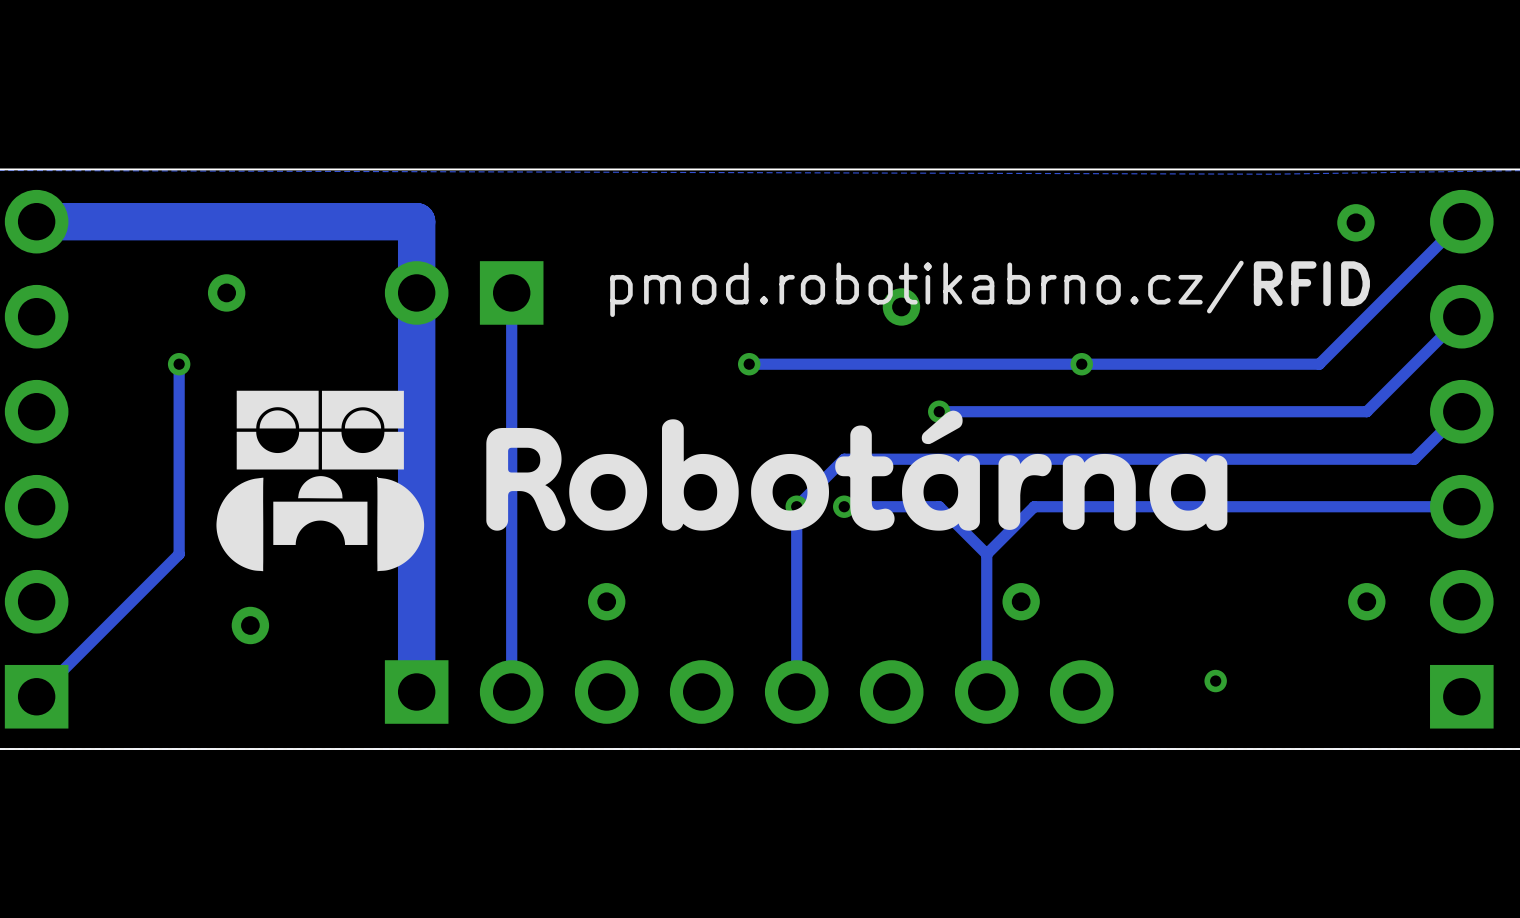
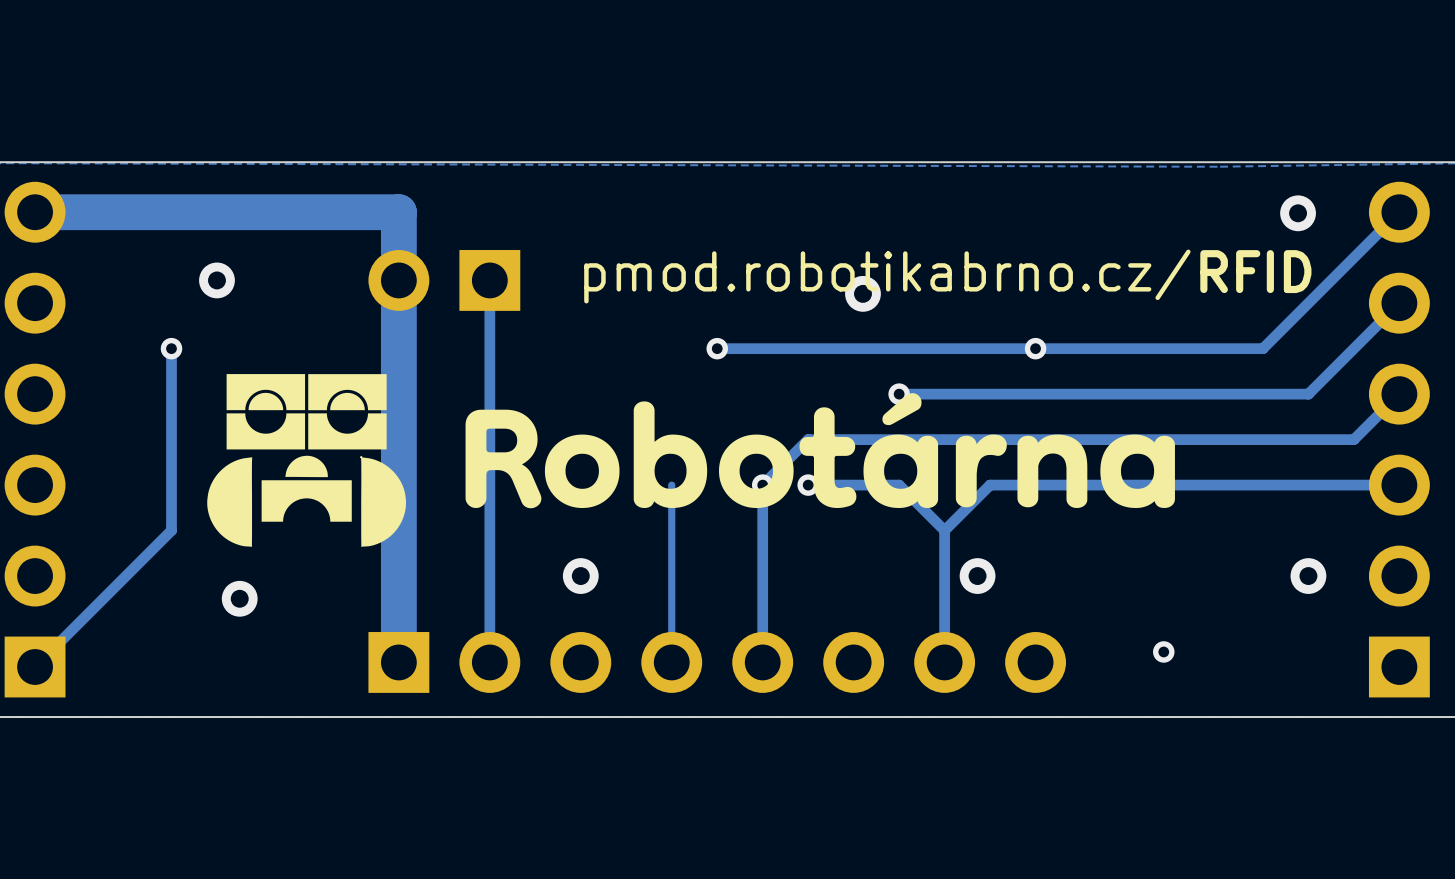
track: none -> (671, 485) (671, 667)

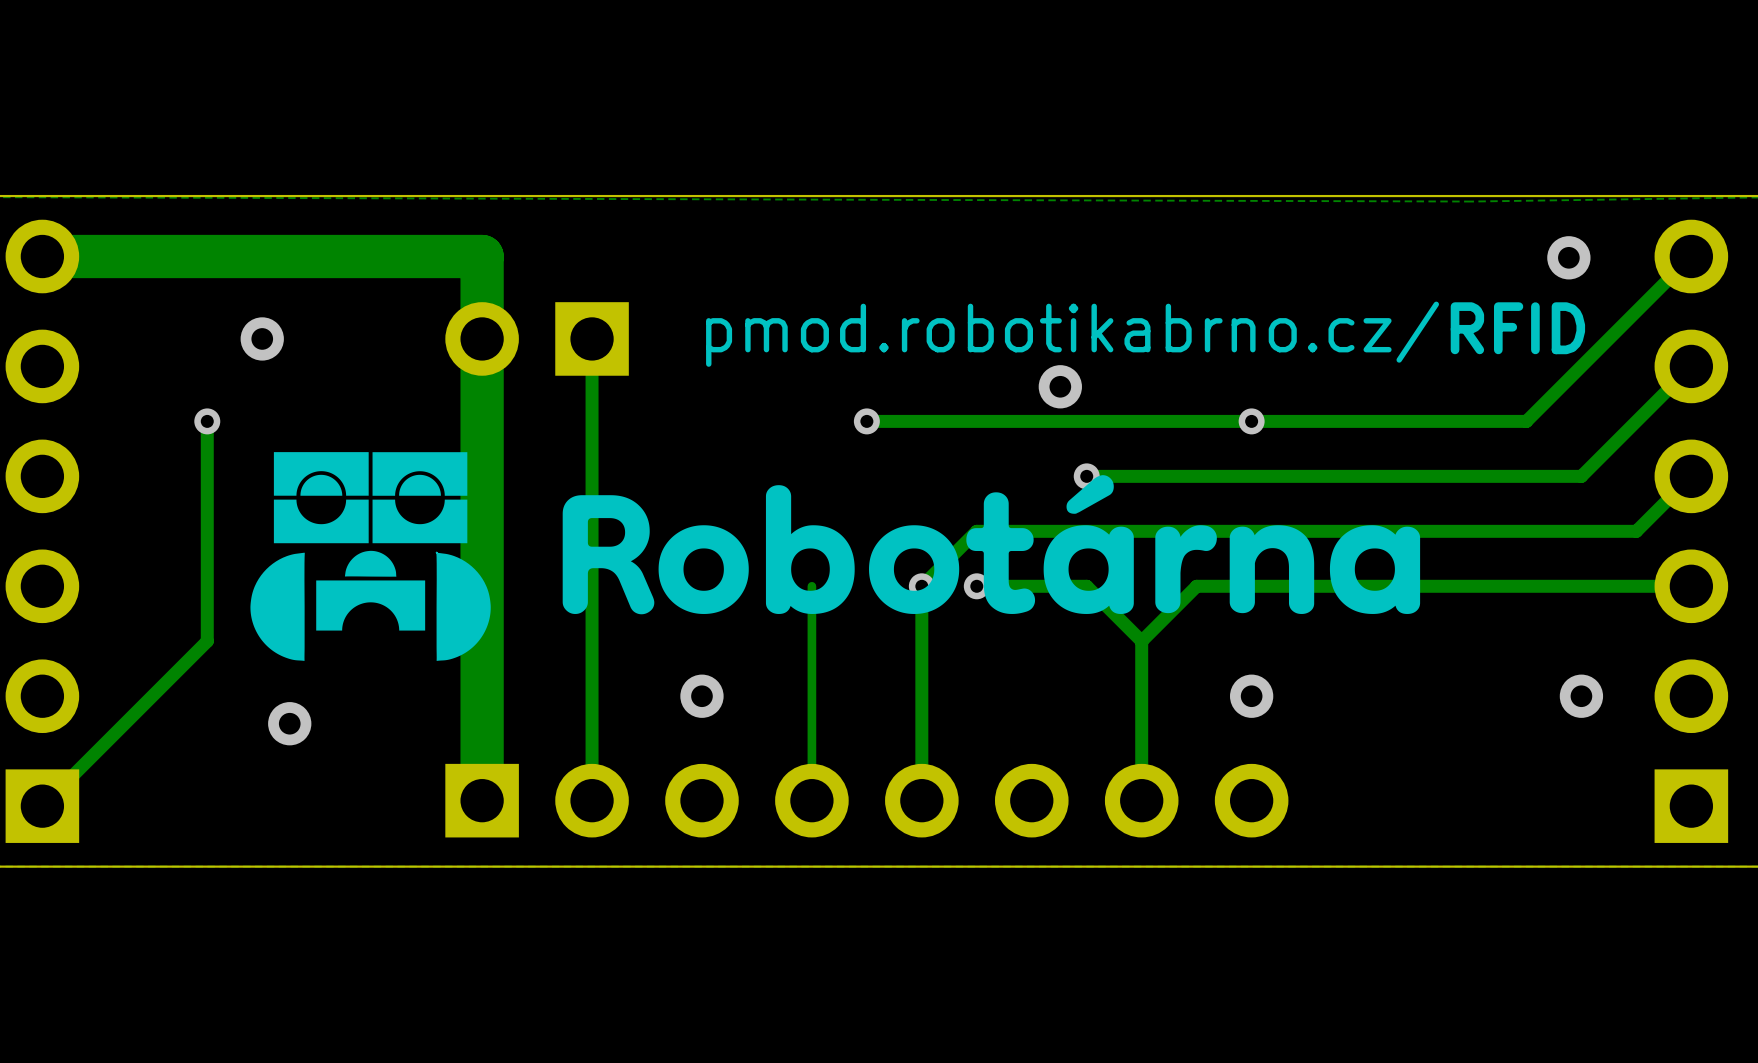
via position: (862, 293) -> (1060, 386)
via position: (977, 576) -> (1251, 696)
via: (1163, 651) -> none

